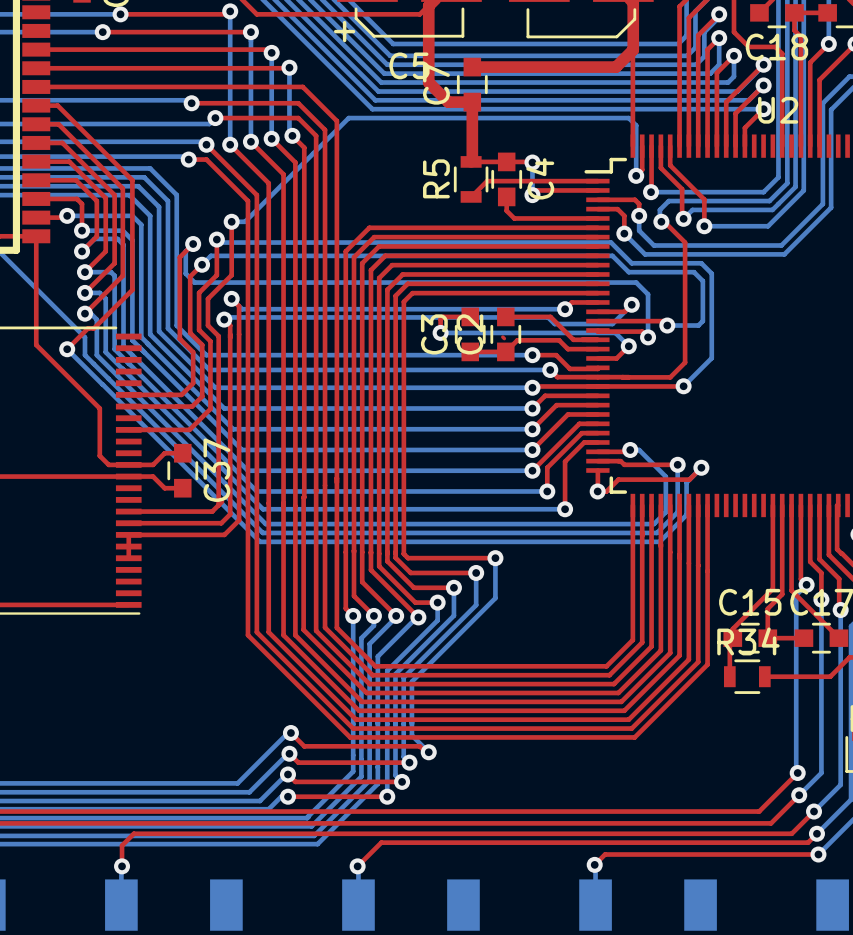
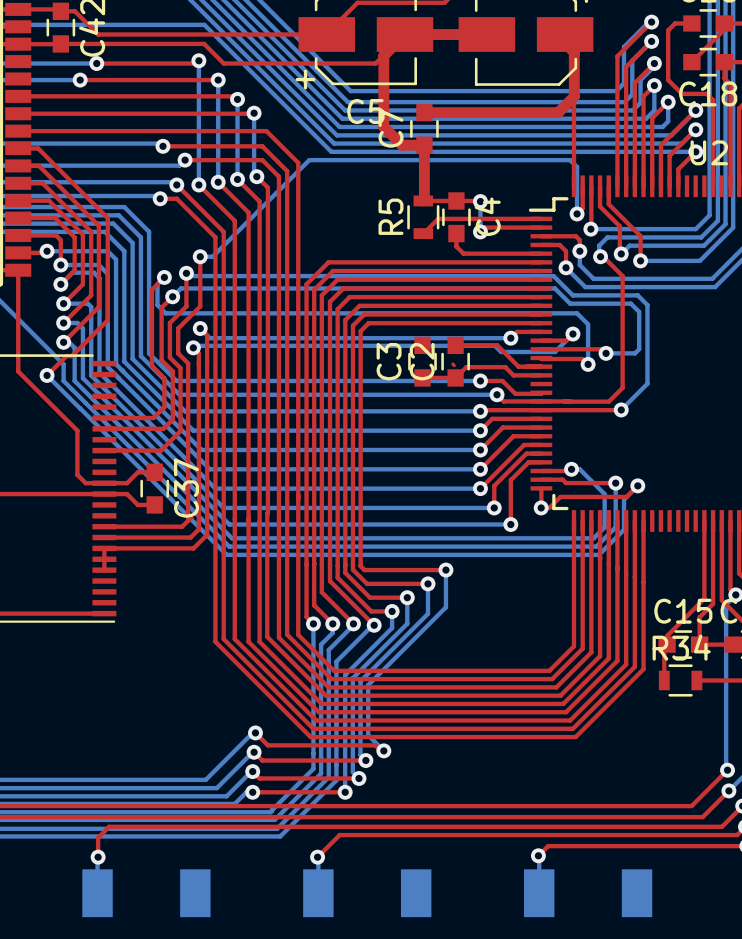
top track: (470, 316) (443, 316) (440, 319) (440, 332) -> none
bottom track: (440, 332) (615, 332) (628, 346) -> none
via: (440, 332) -> none
top track: (628, 346) (616, 358) (597, 358) -> none
via: (628, 346) -> none

